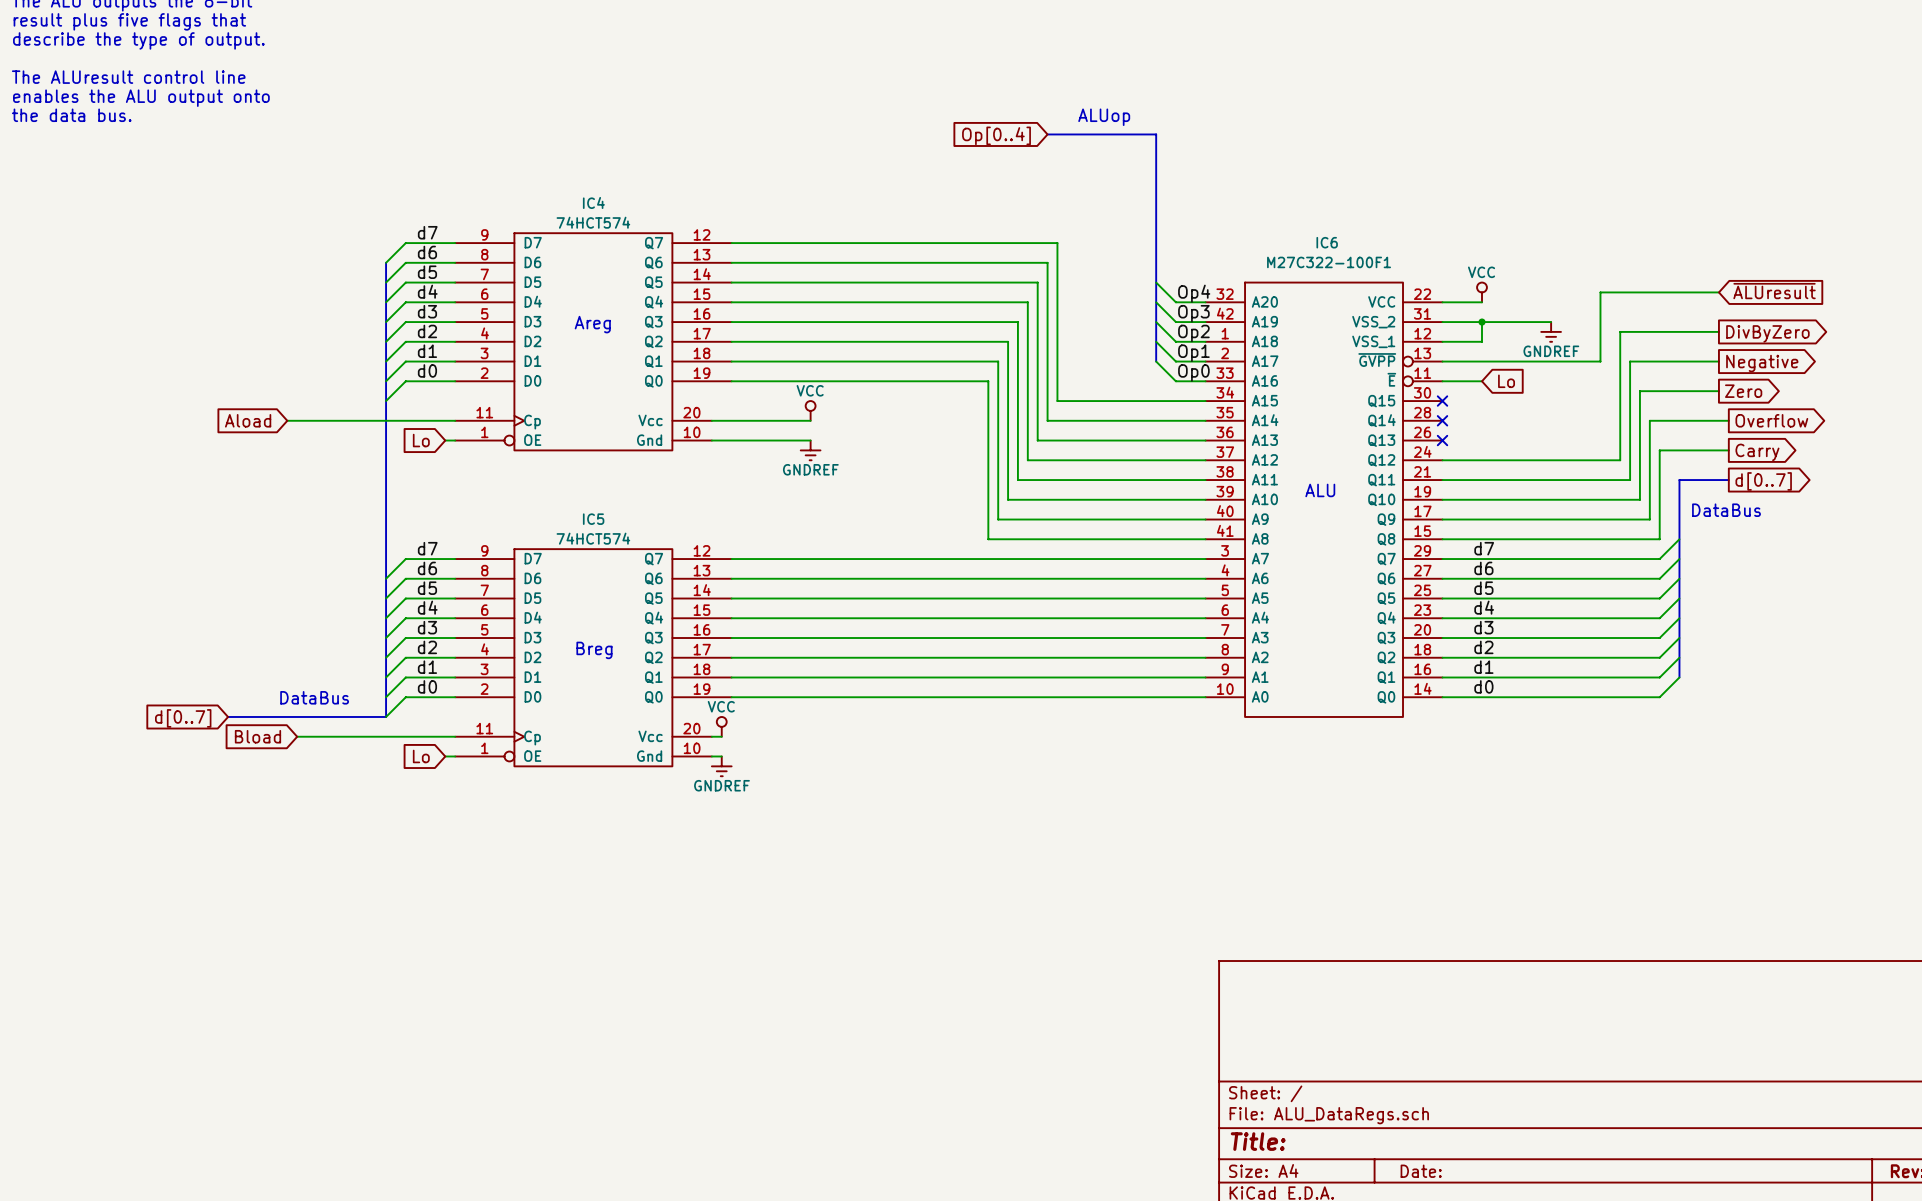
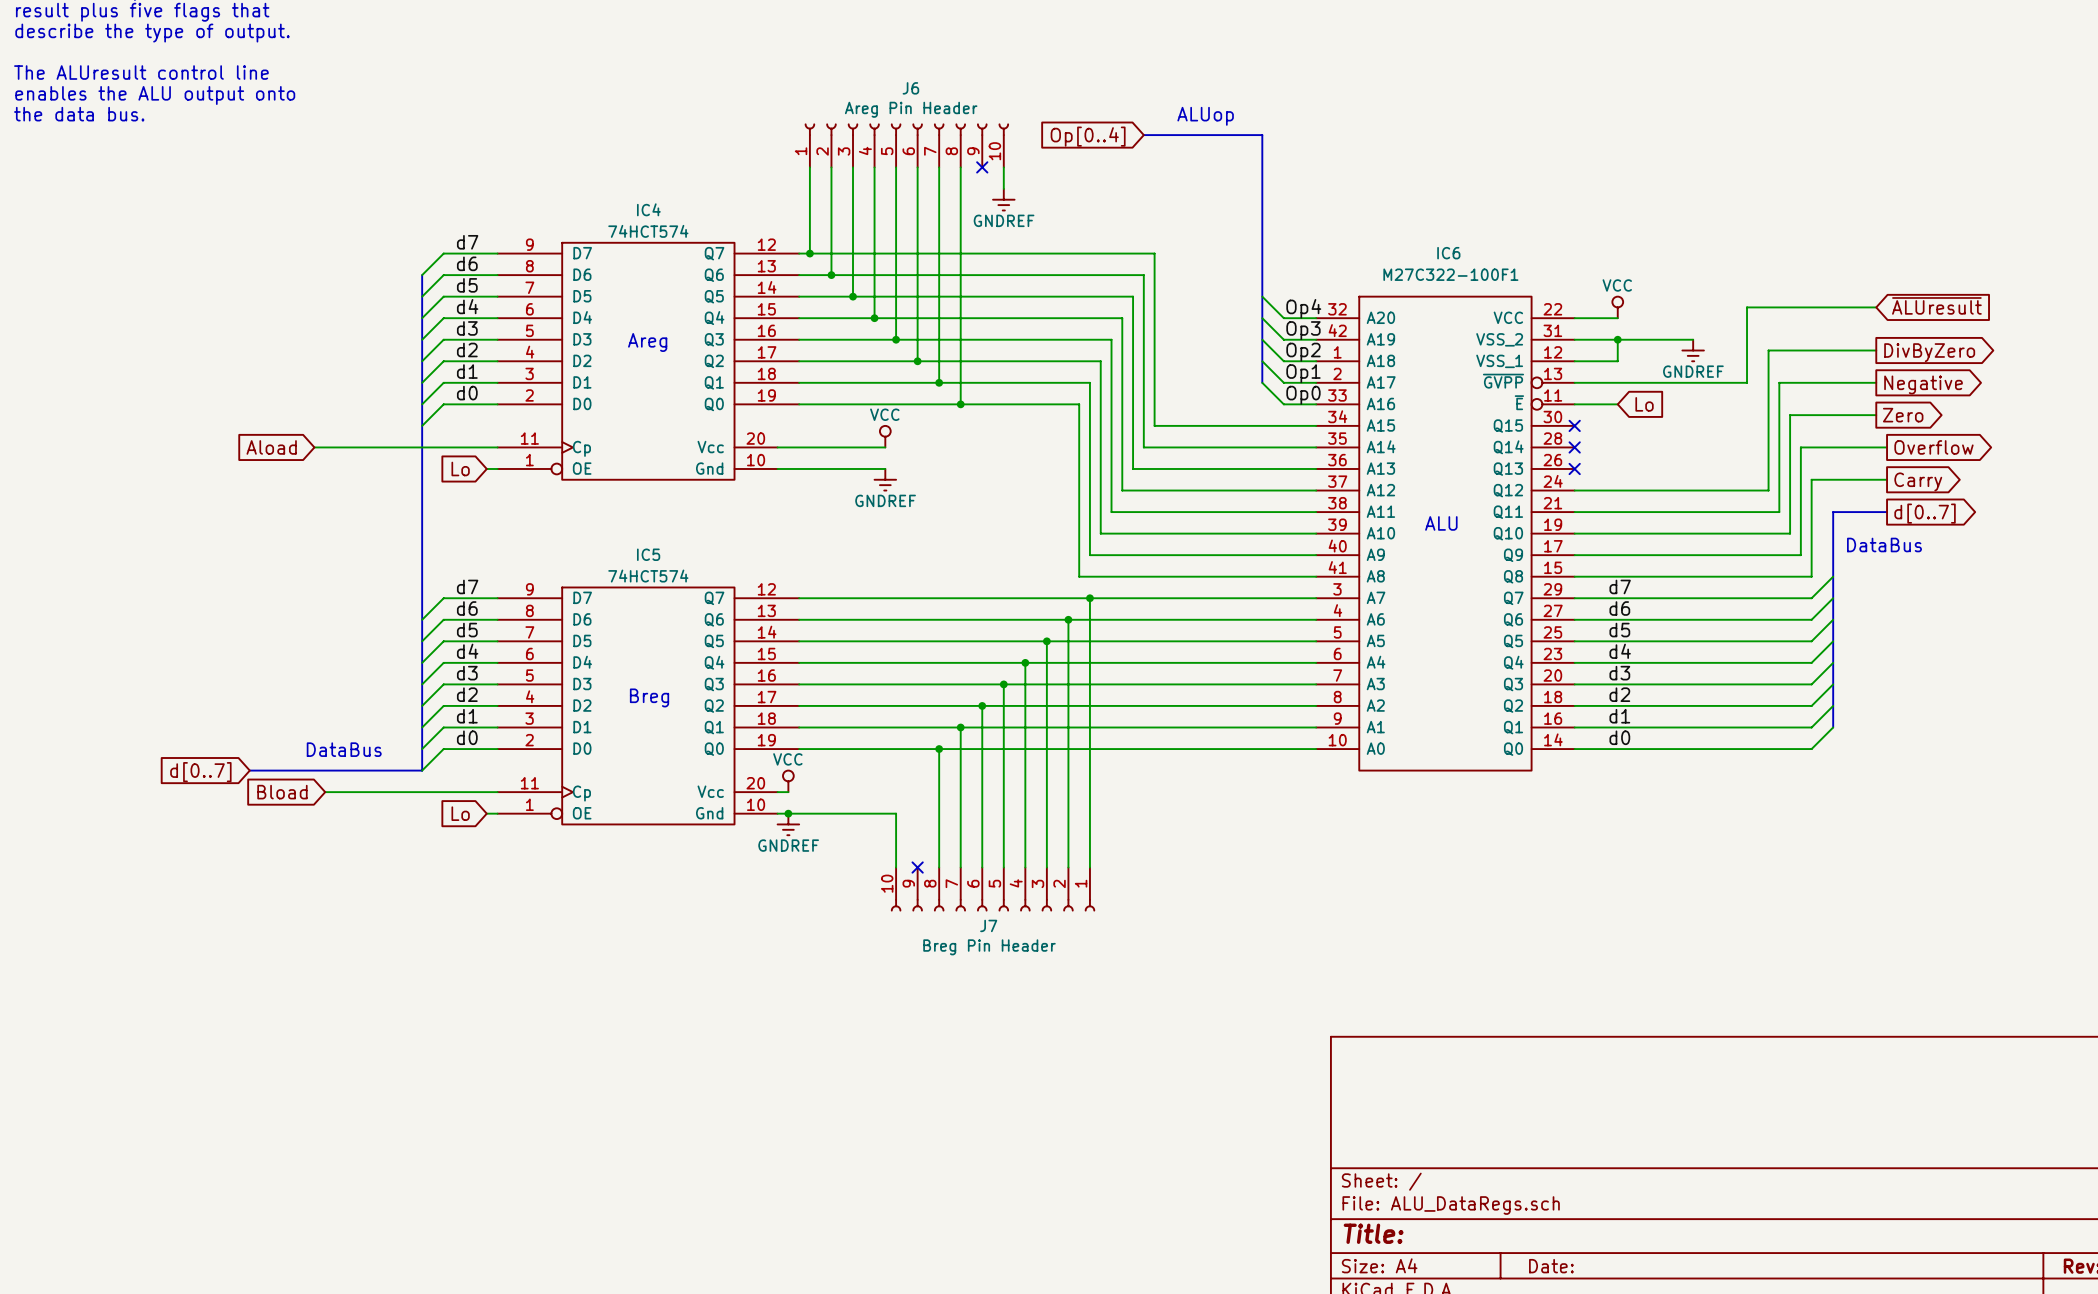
J6: none -> Areg Pin Header (906, 145)
wire: none -> (809, 167) (809, 253)
wire: none -> (831, 167) (831, 275)
wire: none -> (853, 167) (853, 296)
wire: none -> (874, 167) (874, 318)
wire: none -> (896, 167) (896, 339)
wire: none -> (917, 167) (917, 361)
wire: none -> (939, 167) (939, 382)
wire: none -> (960, 167) (960, 404)
no-connect mark: none -> (982, 167)
wire: none -> (1003, 167) (1003, 188)
power symbol: none -> GNDREF (1003, 199)
junction: none -> (809, 253)
junction: none -> (831, 275)
junction: none -> (853, 296)
junction: none -> (874, 318)
junction: none -> (896, 339)
junction: none -> (917, 361)
junction: none -> (939, 382)
junction: none -> (960, 404)
wire: none -> (1089, 598) (1089, 867)
junction: none -> (1089, 598)
wire: none -> (1068, 619) (1068, 867)
junction: none -> (1068, 619)
wire: none -> (1046, 641) (1046, 867)
junction: none -> (1046, 641)
wire: none -> (1025, 662) (1025, 867)
junction: none -> (1025, 662)
wire: none -> (1003, 684) (1003, 867)
junction: none -> (1003, 684)
wire: none -> (982, 705) (982, 867)
junction: none -> (982, 705)
wire: none -> (960, 727) (960, 867)
junction: none -> (960, 727)
wire: none -> (939, 749) (939, 867)
junction: none -> (939, 749)
wire: none -> (788, 813) (896, 813) (896, 867)
junction: none -> (788, 813)
no-connect mark: none -> (917, 867)
J7: none -> Breg Pin Header (993, 889)

